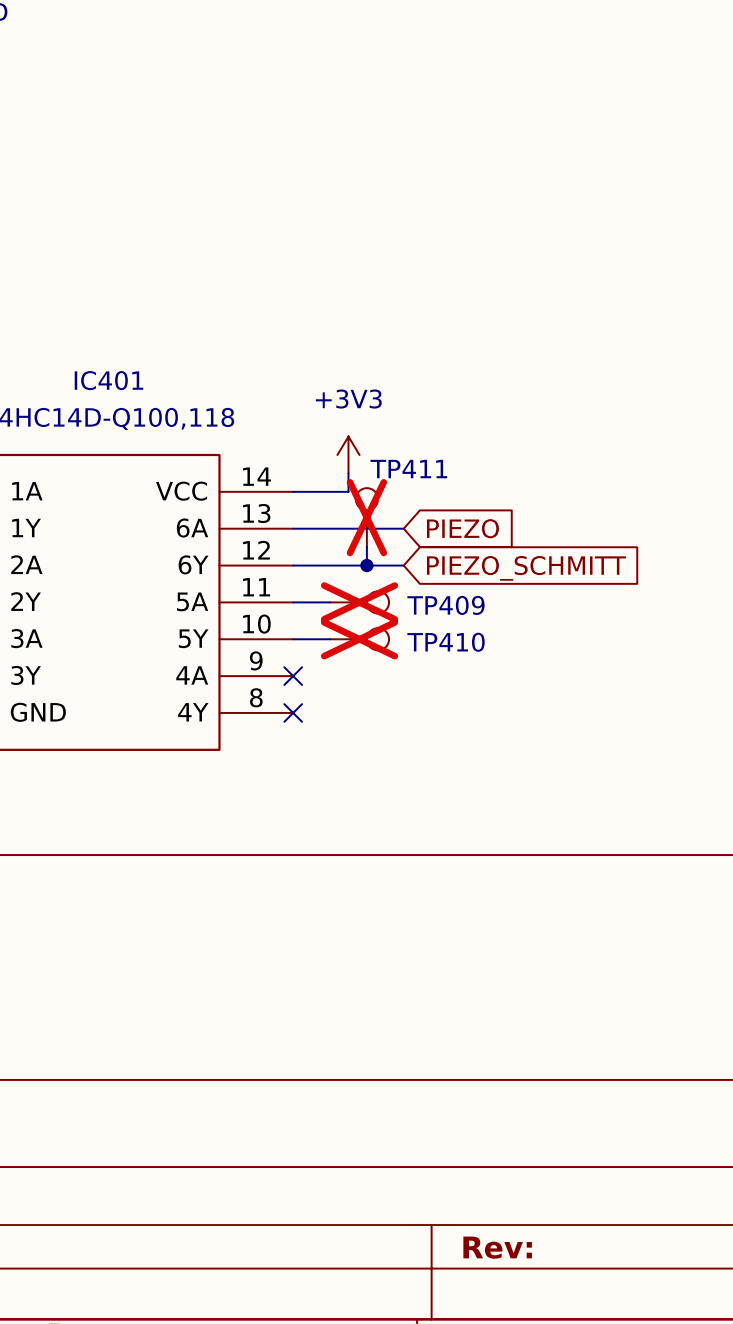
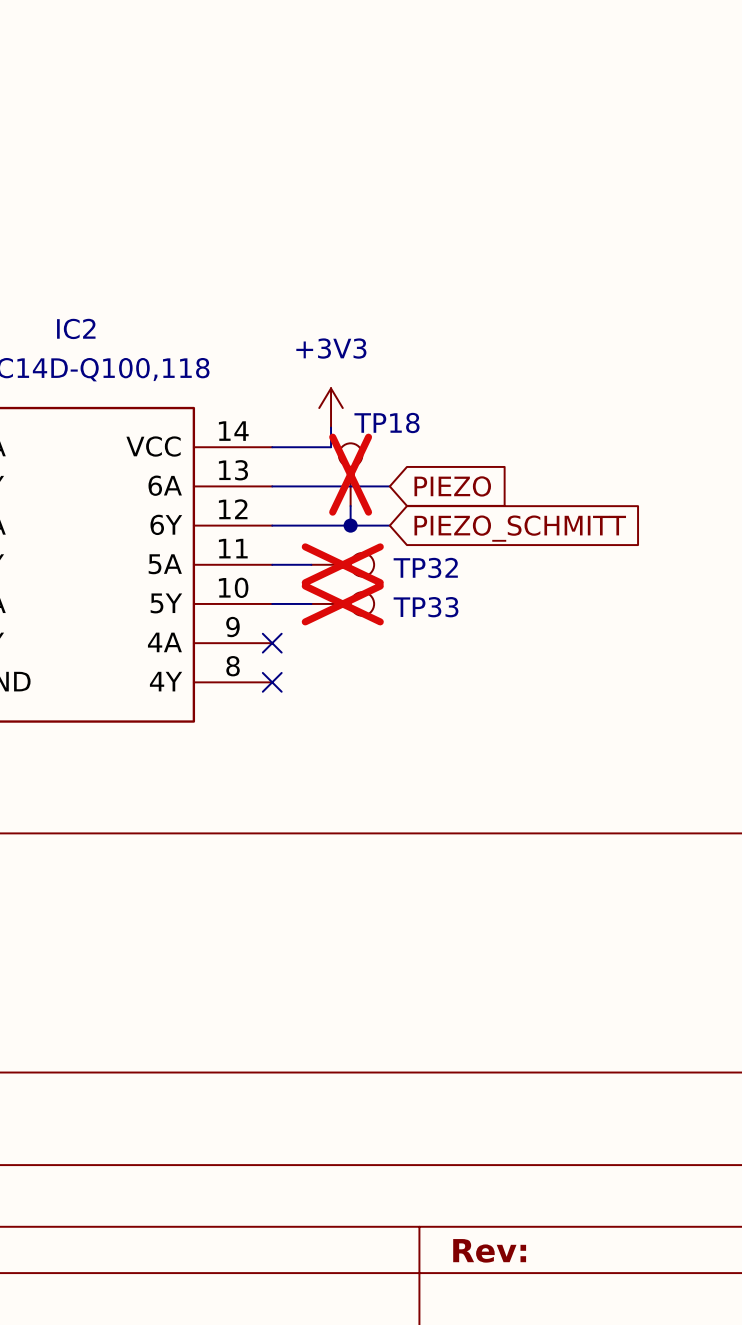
IC401 name: IC401 (108, 380) -> IC2 (76, 328)
TP411 name: TP411 (408, 469) -> TP18 (386, 423)
TP409 name: TP409 (445, 605) -> TP32 (425, 567)
TP410 name: TP410 (446, 642) -> TP33 (426, 607)

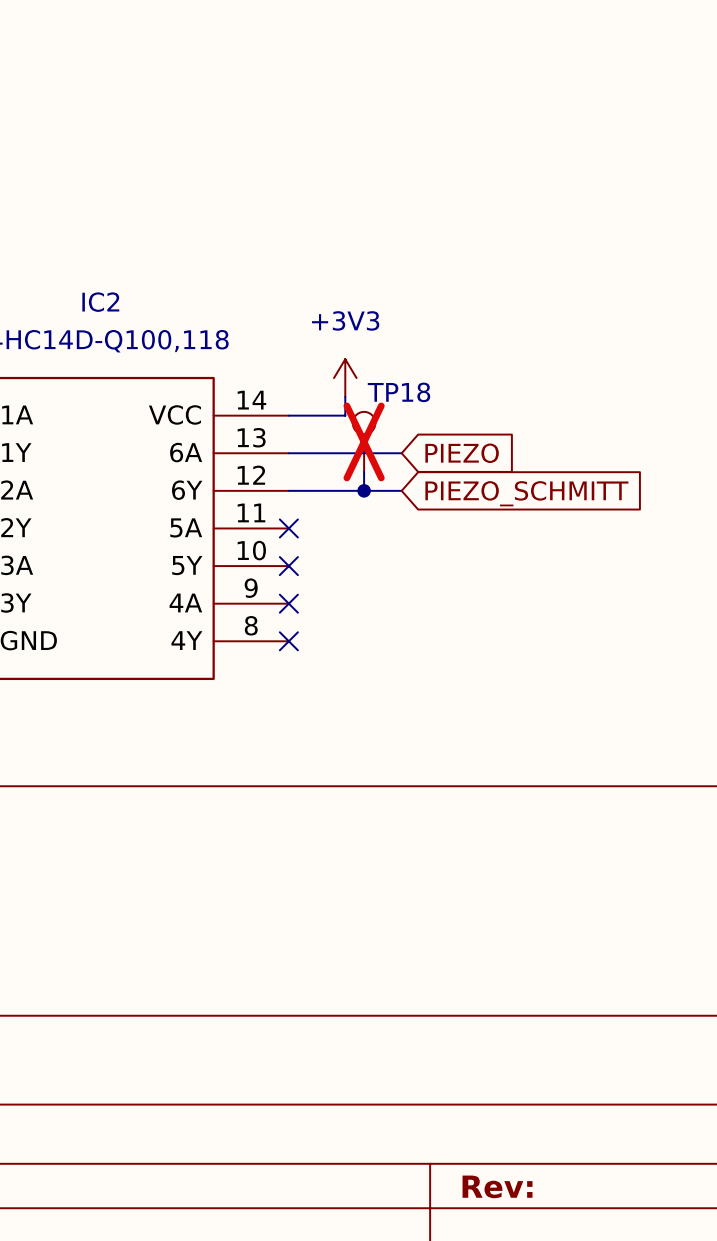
wire: (272, 564) (311, 564) -> none
no-connect mark: none -> (288, 528)
TP32: (342, 564) -> none
wire: (272, 603) (311, 603) -> none
no-connect mark: none -> (288, 566)
TP33: (342, 603) -> none

